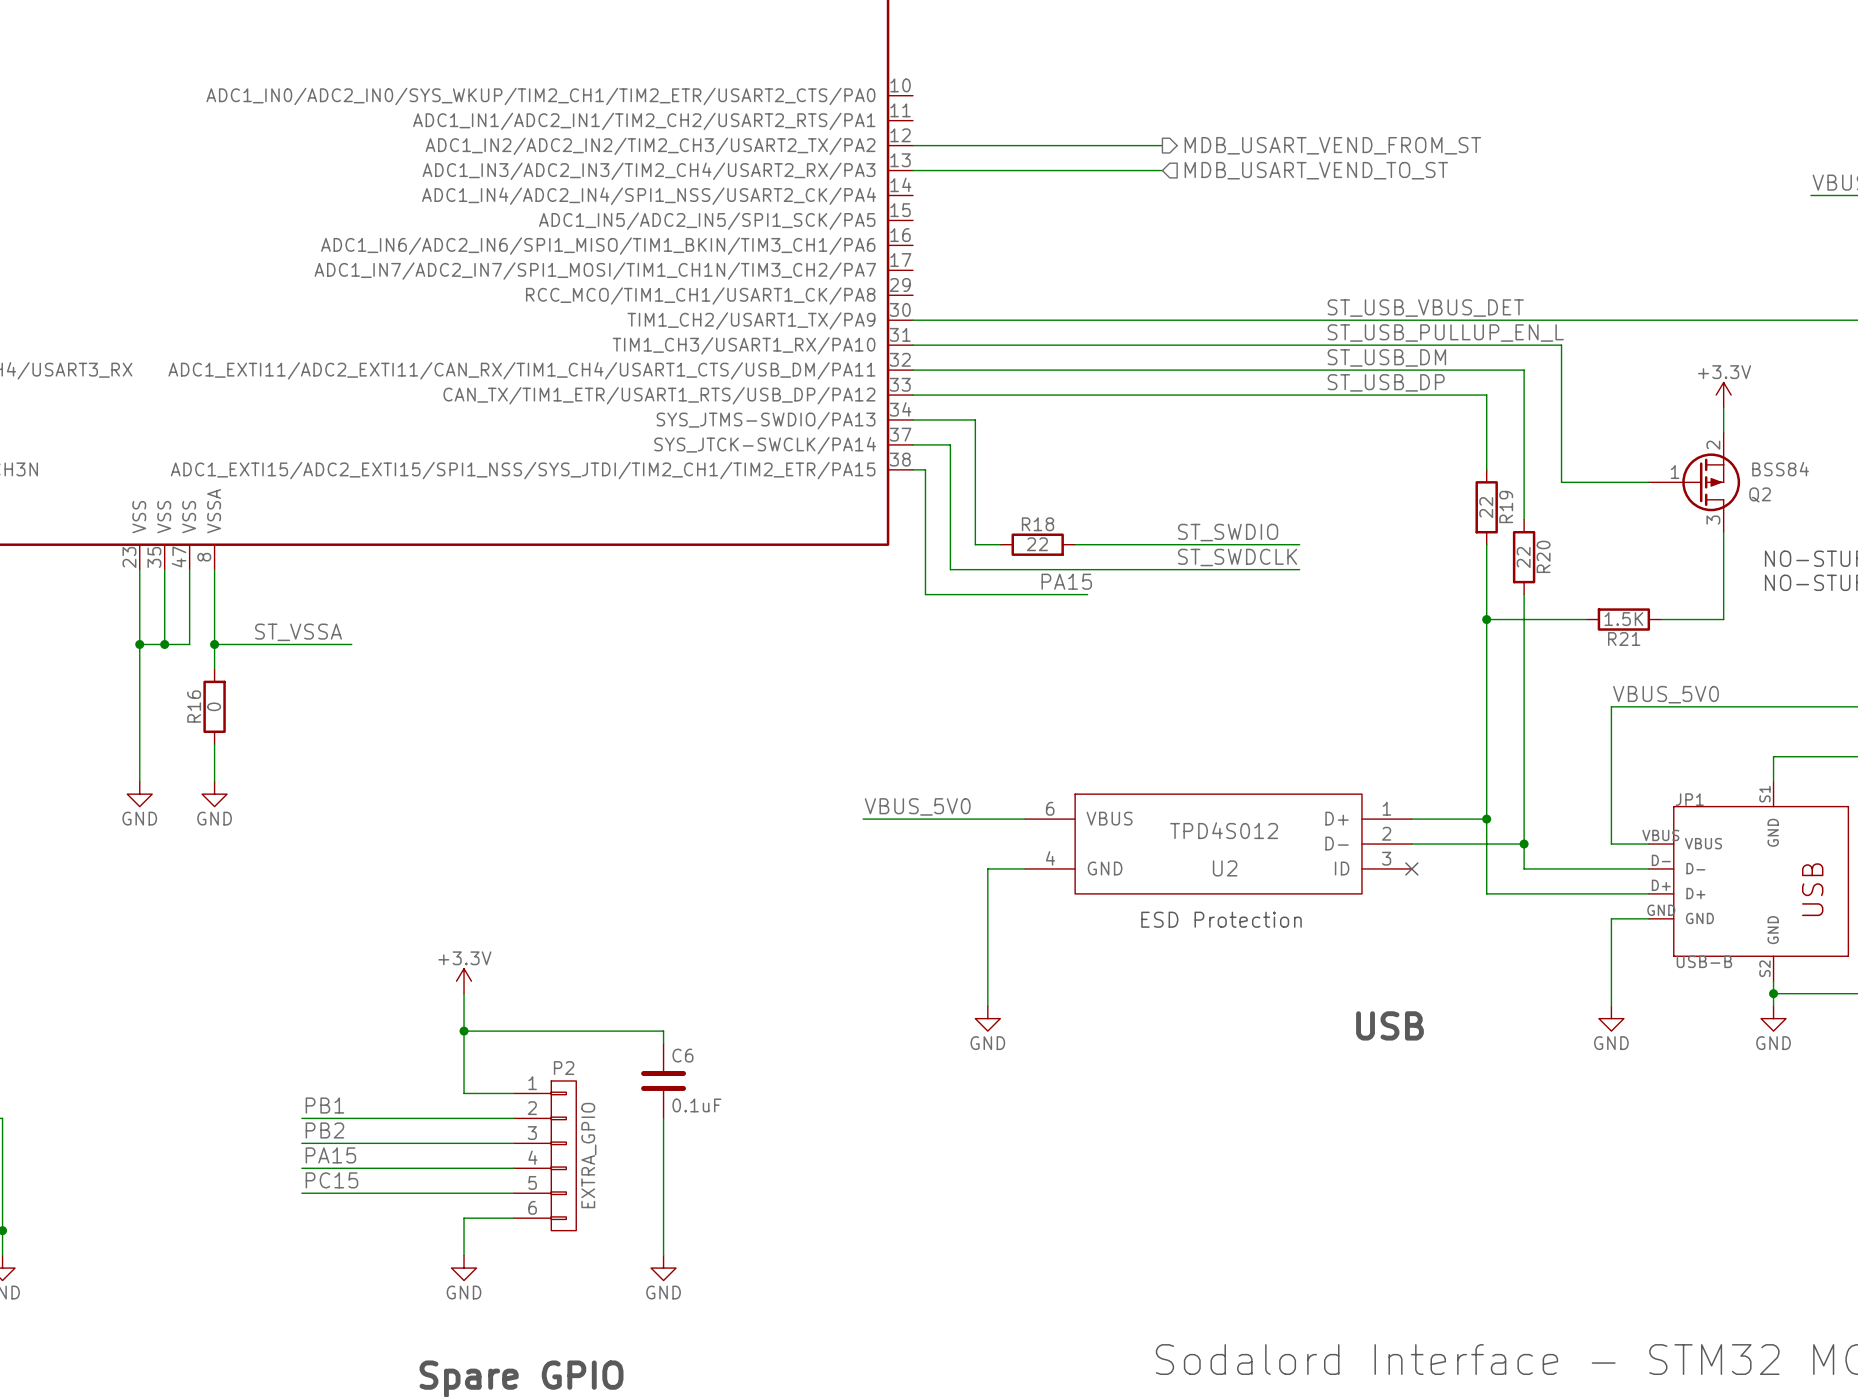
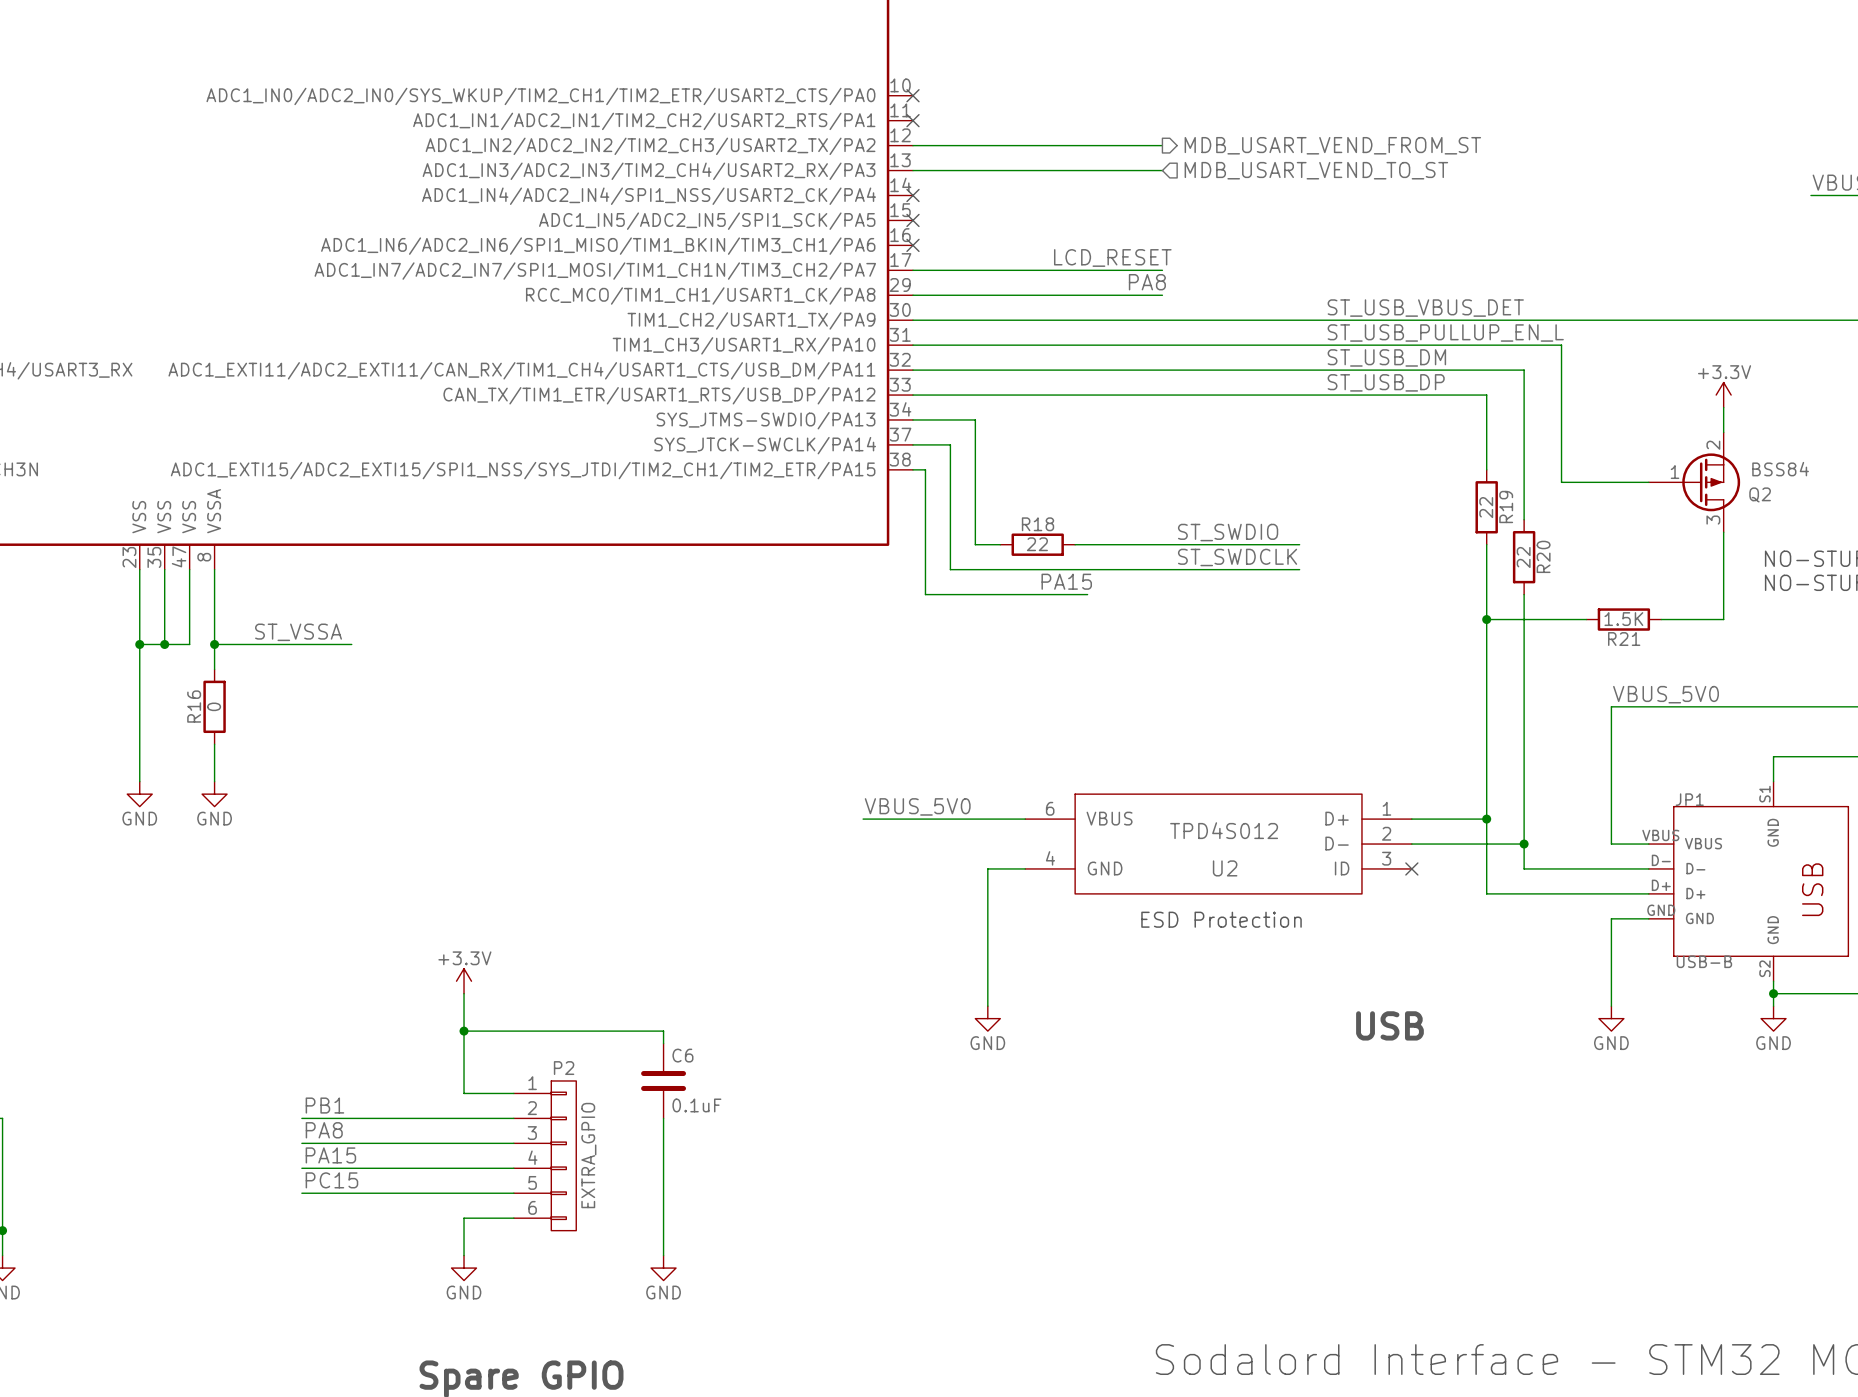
no-connect mark: none -> (912, 95)
no-connect mark: none -> (912, 120)
no-connect mark: none -> (912, 195)
no-connect mark: none -> (912, 220)
no-connect mark: none -> (912, 245)
label: none -> LCD_RESET (1112, 257)
wire: none -> (912, 270) (1162, 270)
label: none -> PA8 (1147, 282)
wire: none -> (912, 295) (1162, 295)
label: PB2 (324, 1130) -> PA8 (324, 1130)

